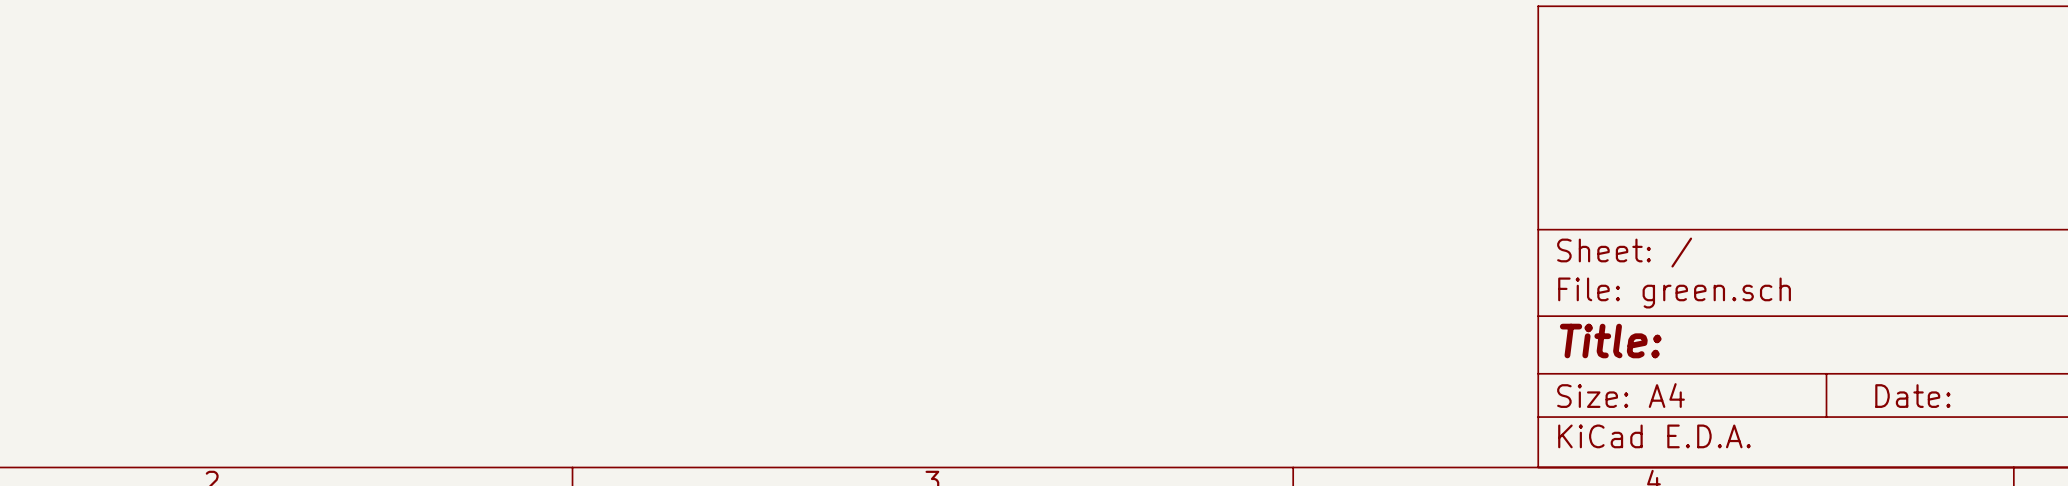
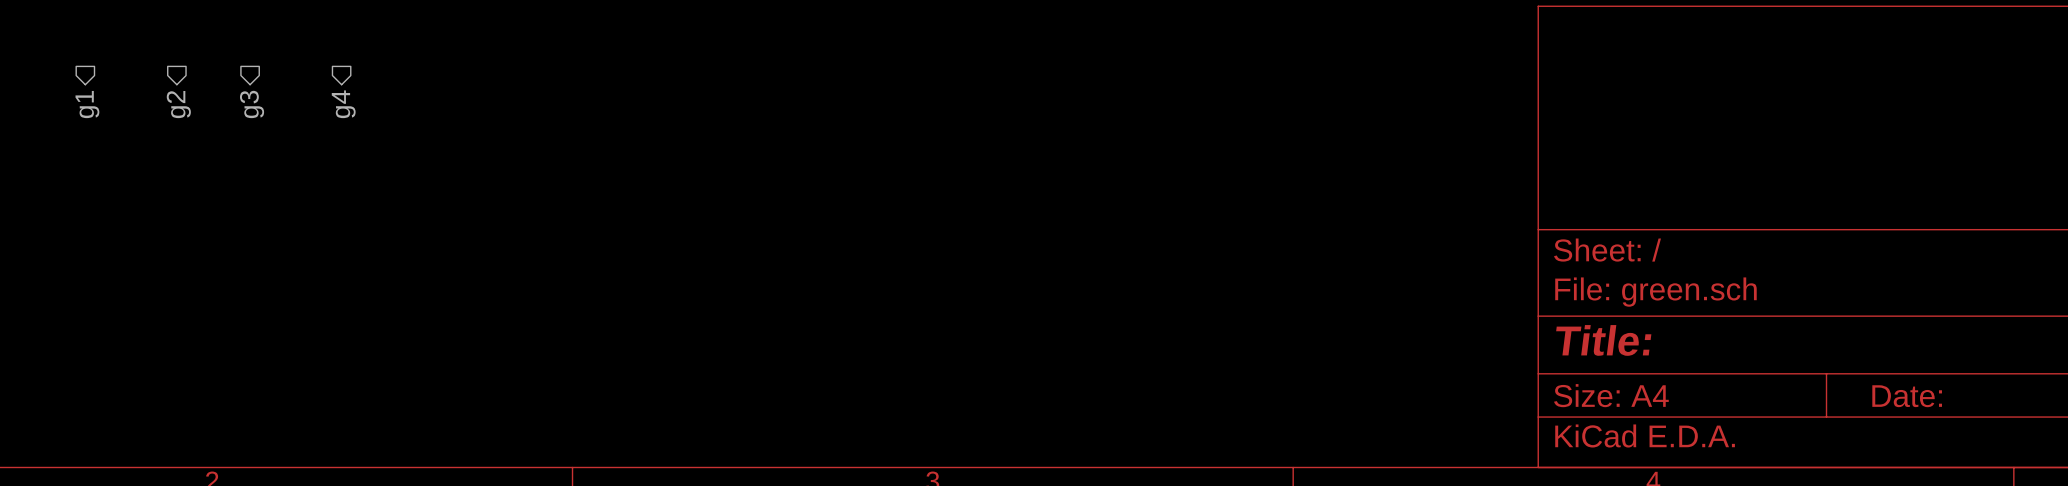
hierarchical label: none -> g4 (343, 104)
hierarchical label: none -> g1 (87, 104)
hierarchical label: none -> g2 (178, 104)
hierarchical label: none -> g3 (252, 104)

